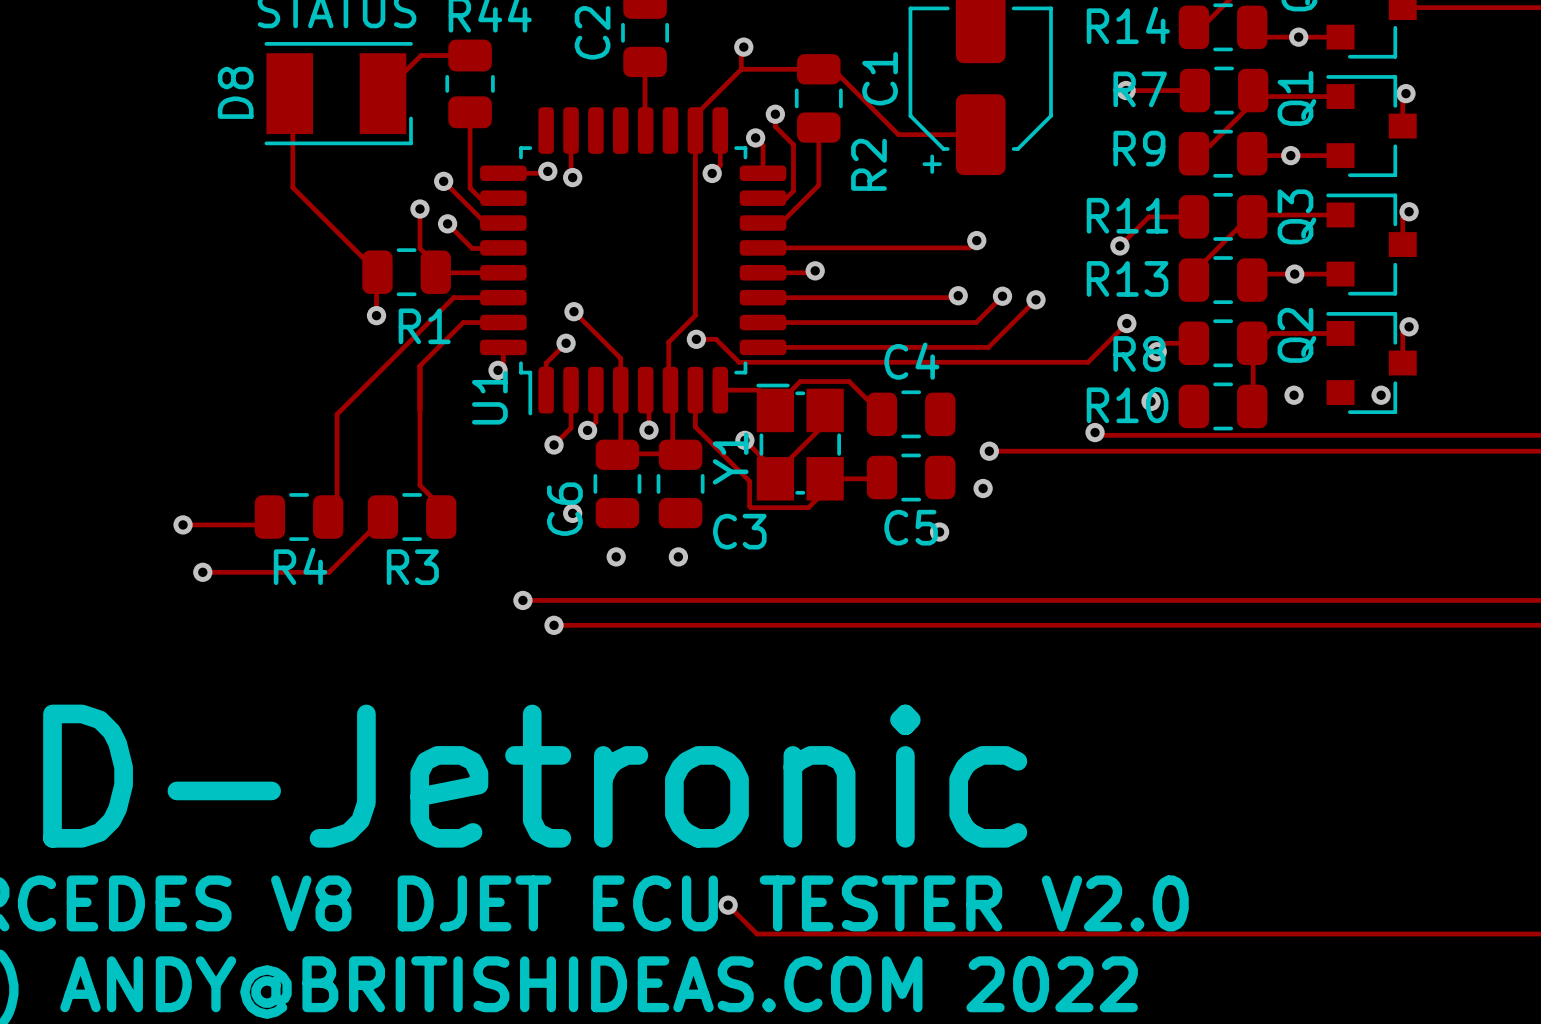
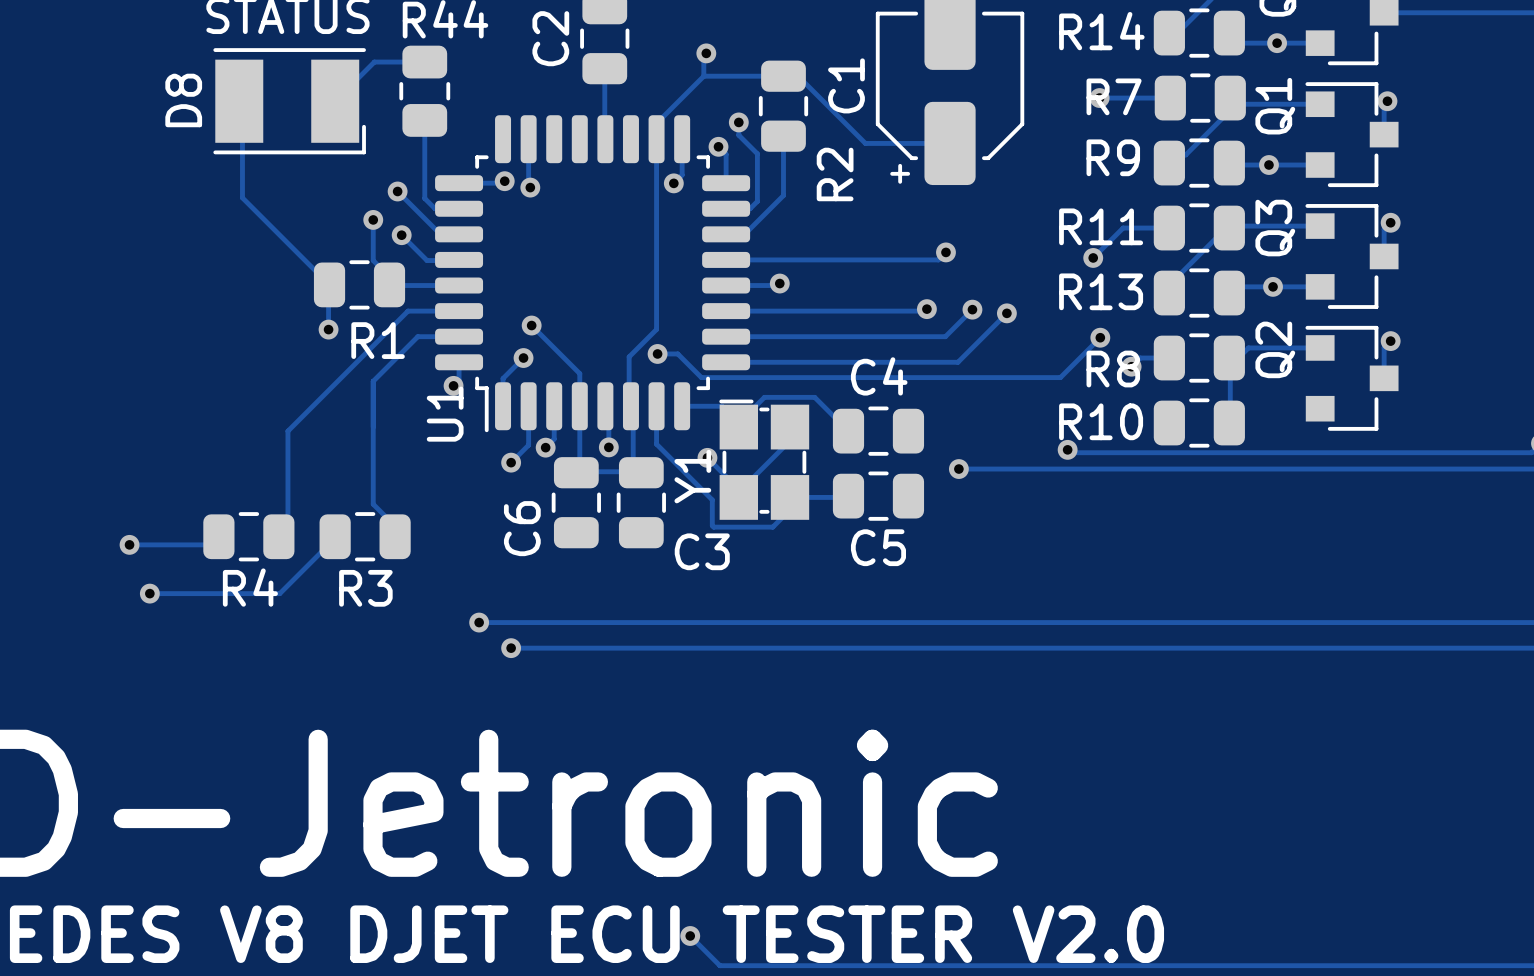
via: (1294, 395) -> none
via: (1381, 395) -> none
via: (1151, 401) -> none
via: (983, 488) -> none
via: (572, 513) -> none
via: (939, 532) -> none
via: (616, 556) -> none
via: (678, 556) -> none

